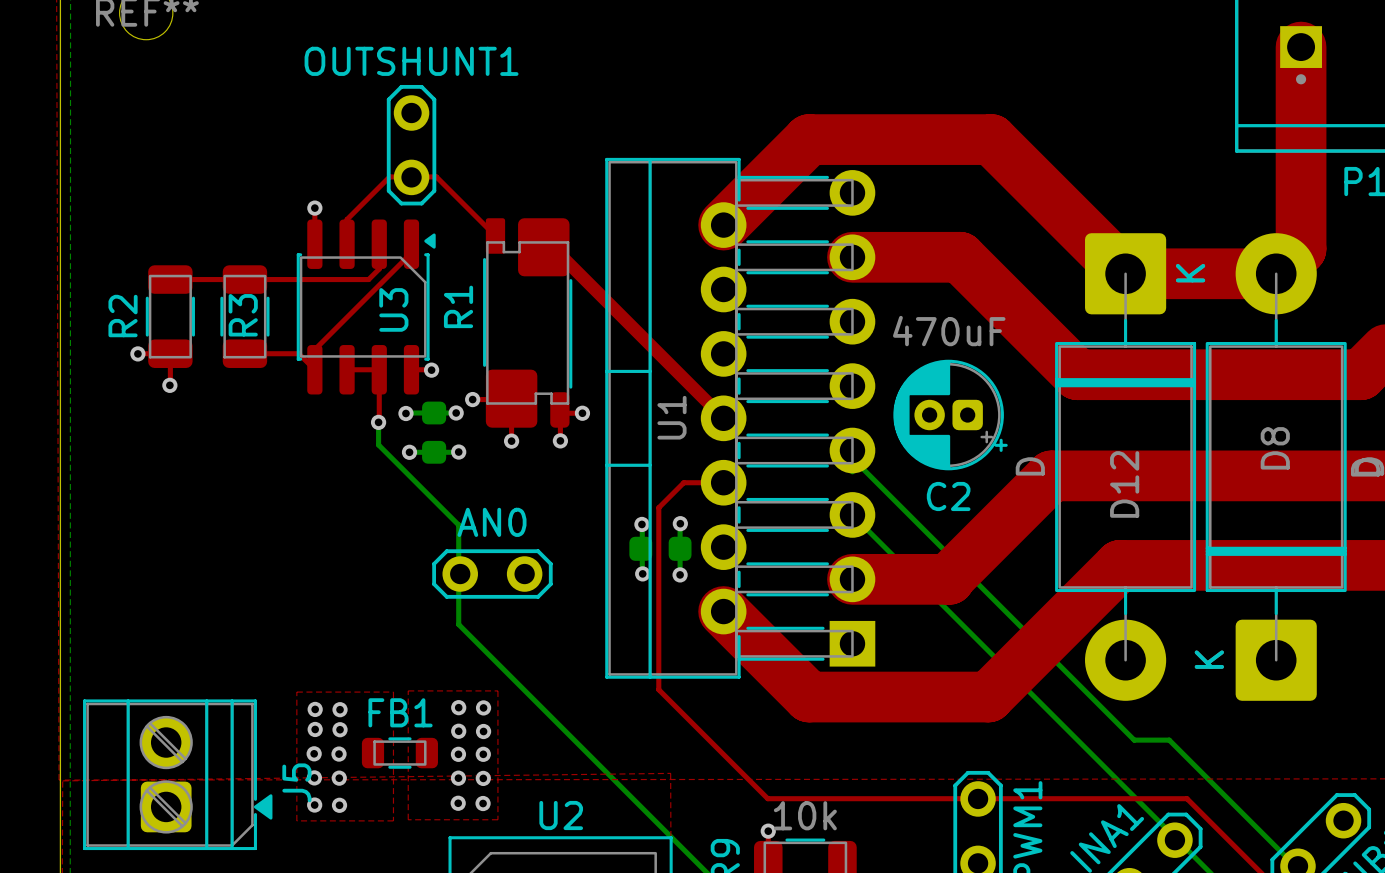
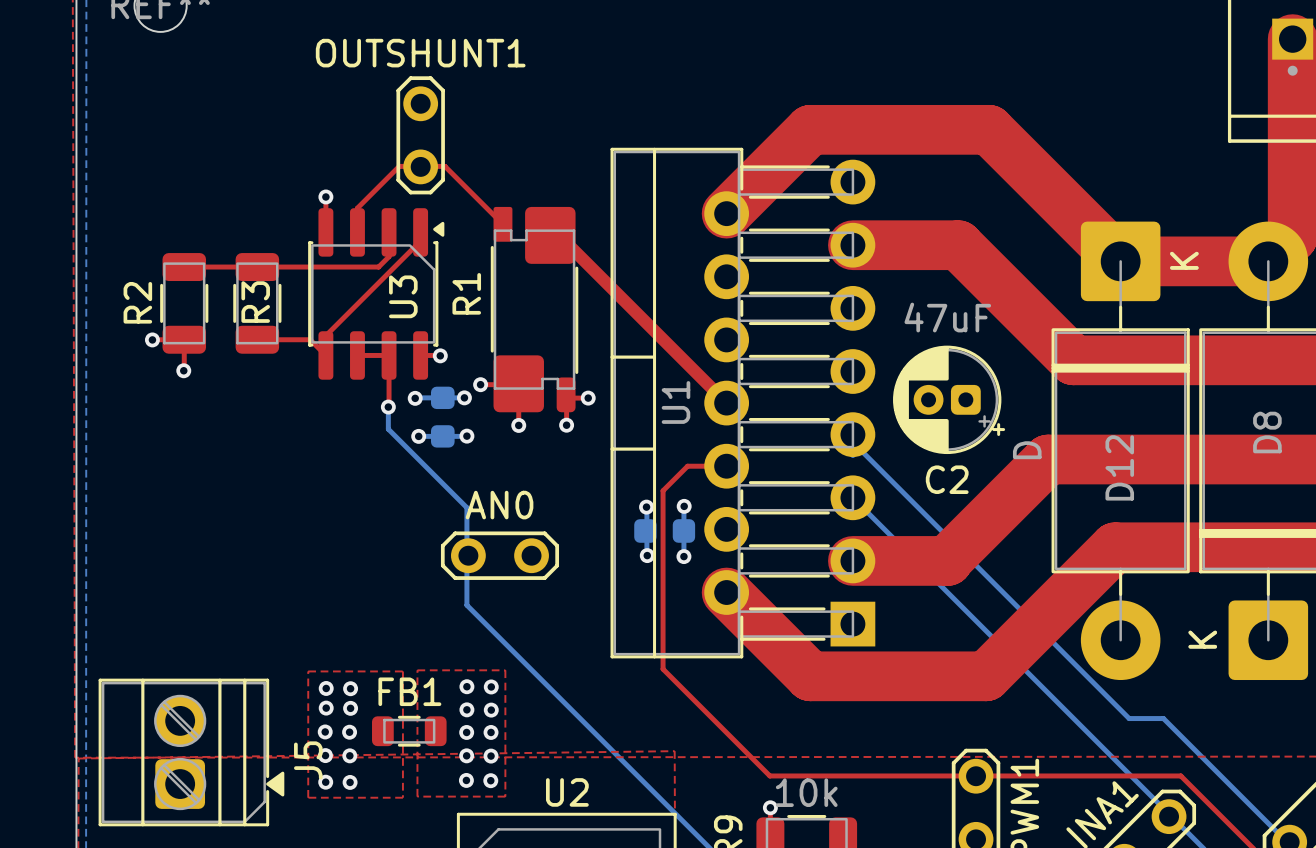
C2 value: 470uF (949, 331) -> 47uF (947, 317)

